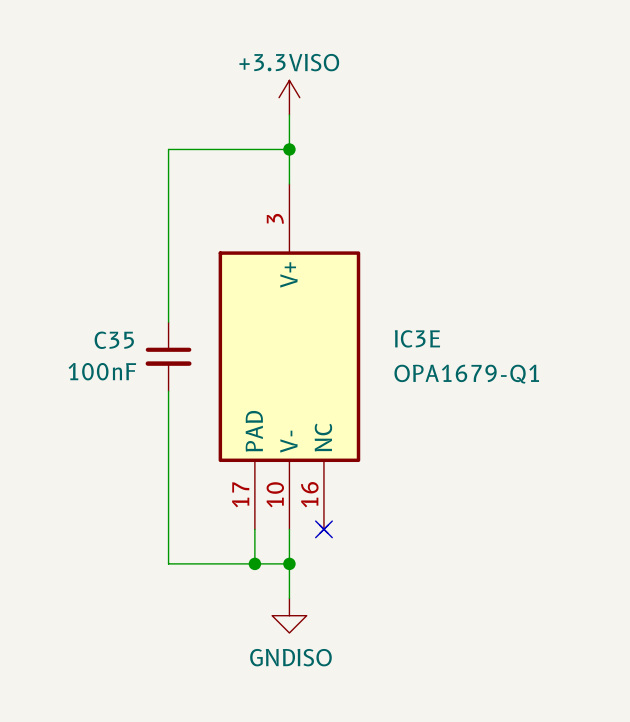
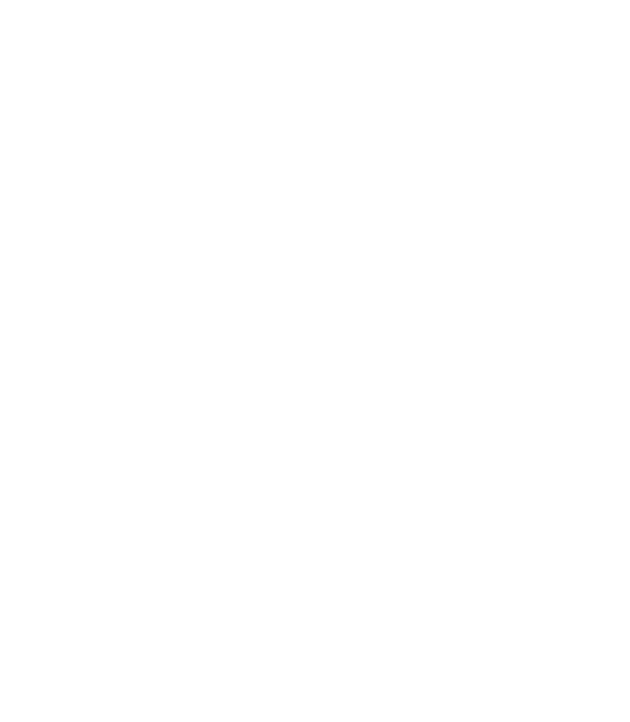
power symbol: +3.3VISO (289, 97) -> none
wire: (289, 114) (289, 184) -> none
wire: (289, 149) (168, 149) (168, 322) -> none
junction: (289, 149) -> none
C35: 100nF (168, 356) -> none
IC3E: OPA1679-Q1 (289, 358) -> none
wire: (168, 391) (168, 563) (289, 563) -> none
wire: (254, 529) (254, 563) -> none
wire: (289, 529) (289, 598) -> none
no-connect mark: (323, 529) -> none
junction: (254, 563) -> none
junction: (289, 563) -> none
power symbol: GNDISO (289, 615) -> none

